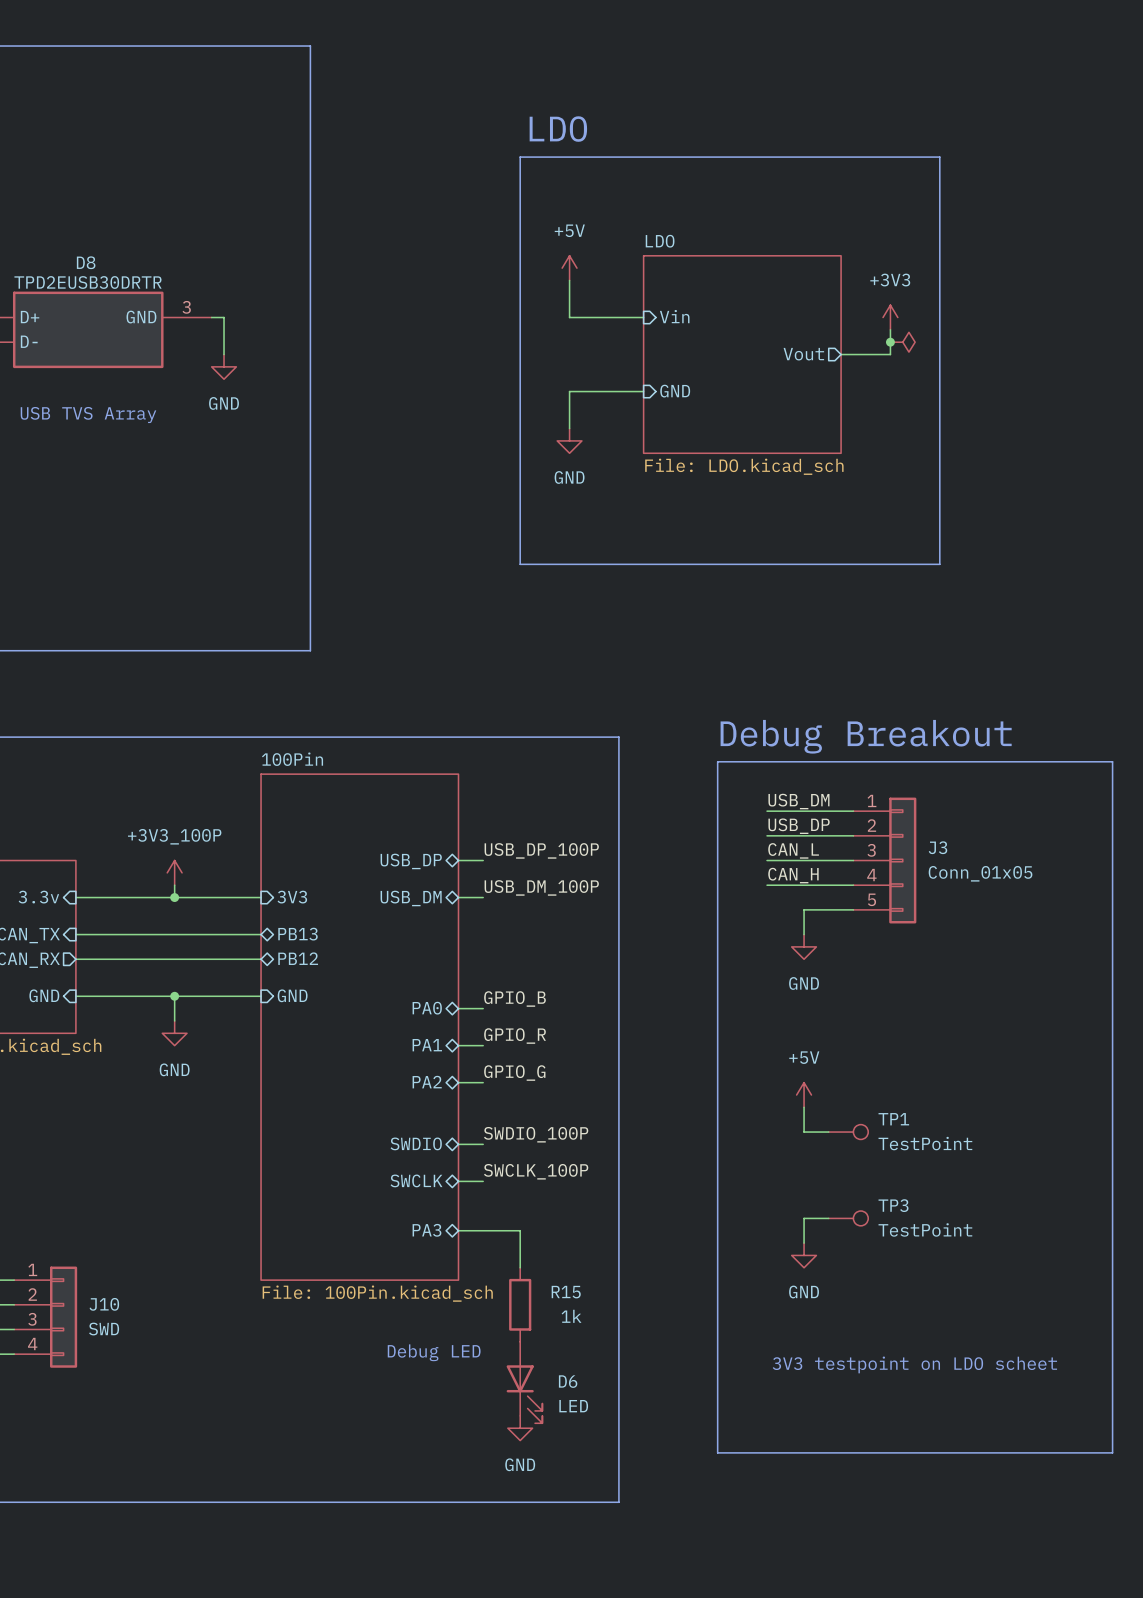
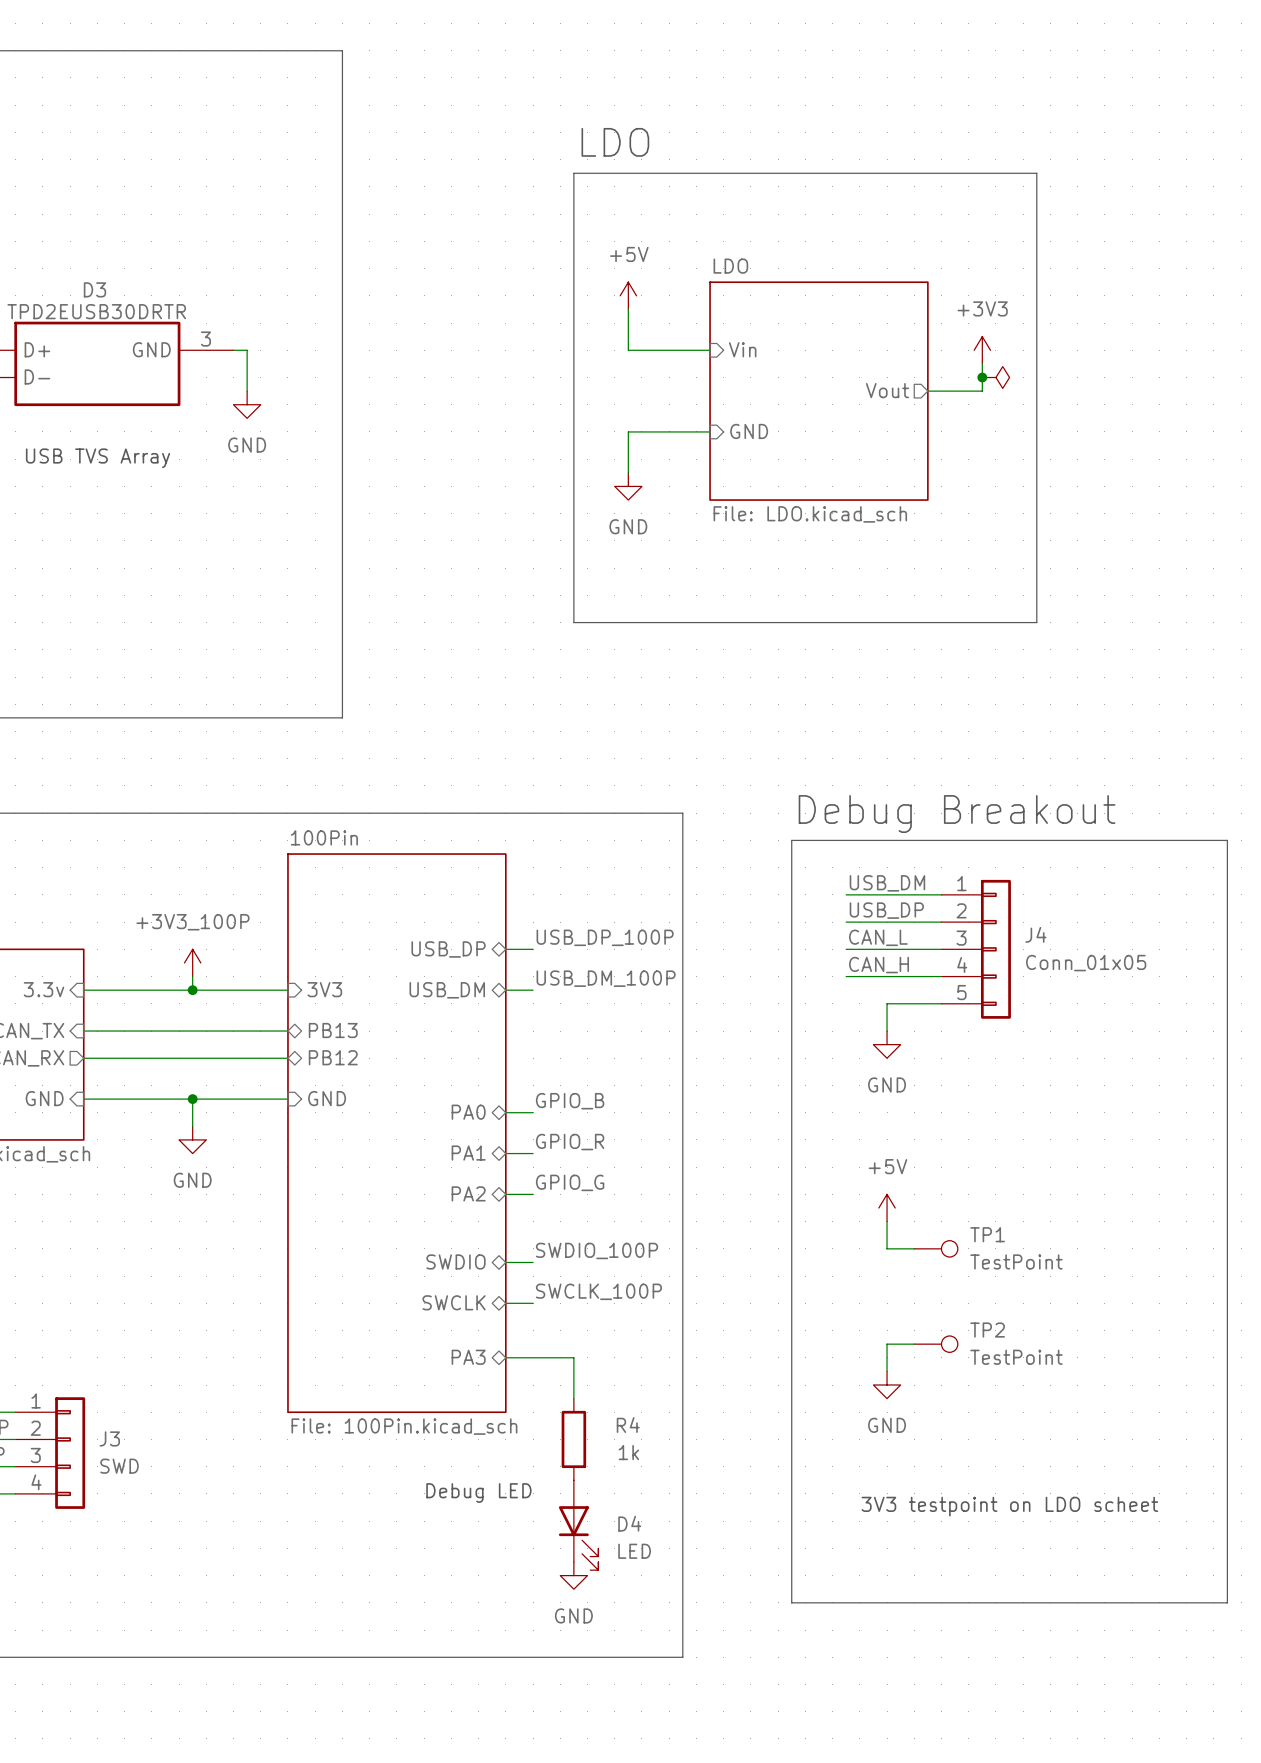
D8 name: D8 (86, 262) -> D3 (94, 289)
J3 name: J3 (938, 847) -> J4 (1035, 934)
TP3 name: TP3 (893, 1205) -> TP2 (987, 1330)
R15 name: R15 (566, 1292) -> R4 (628, 1425)
J10 name: J10 (104, 1304) -> J3 (109, 1438)
D6 name: D6 (568, 1381) -> D4 (629, 1523)

